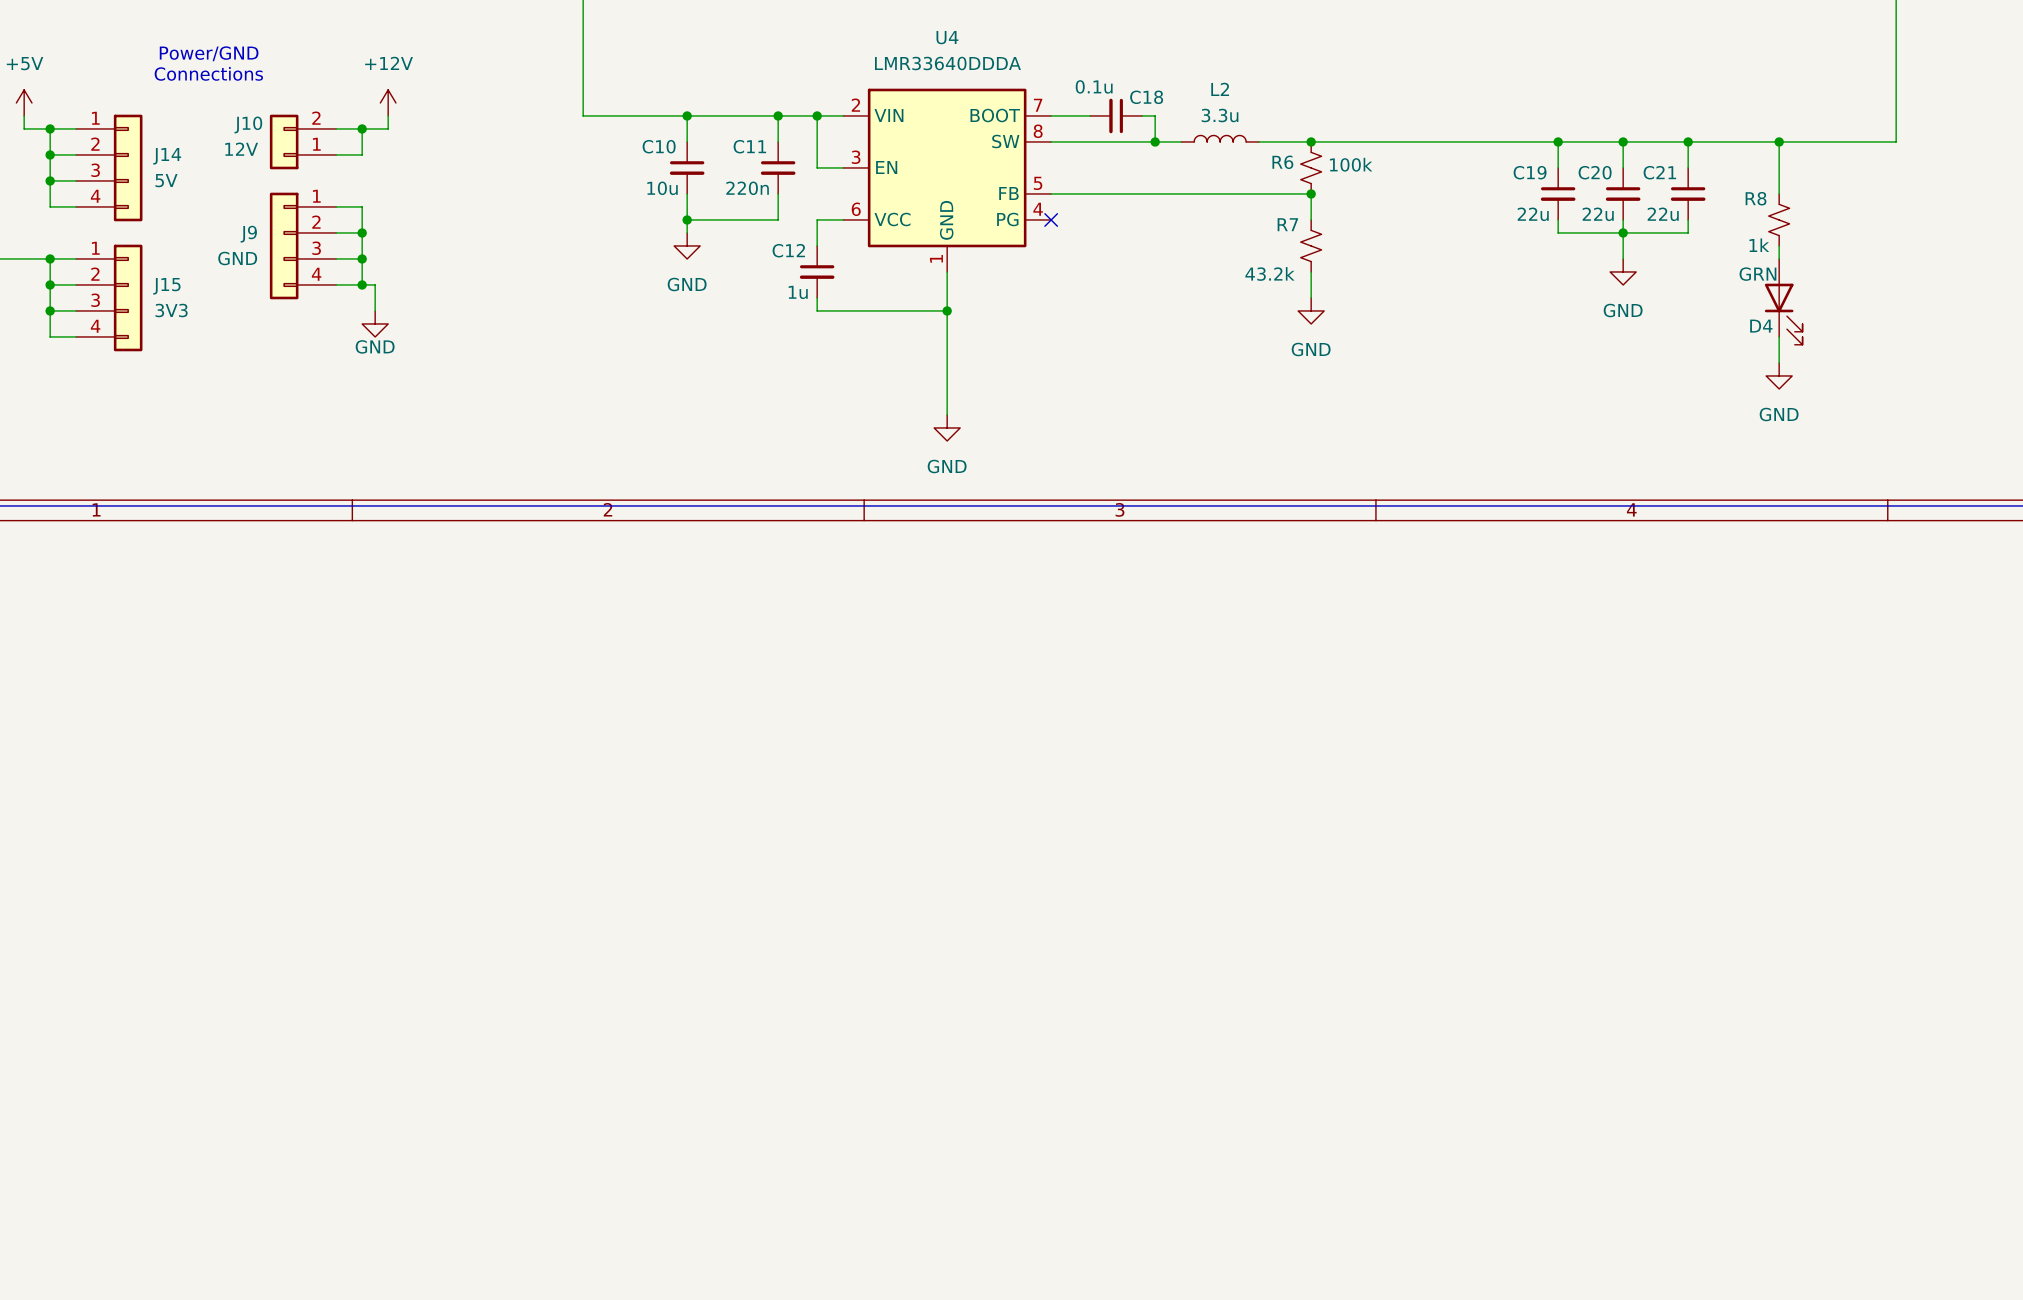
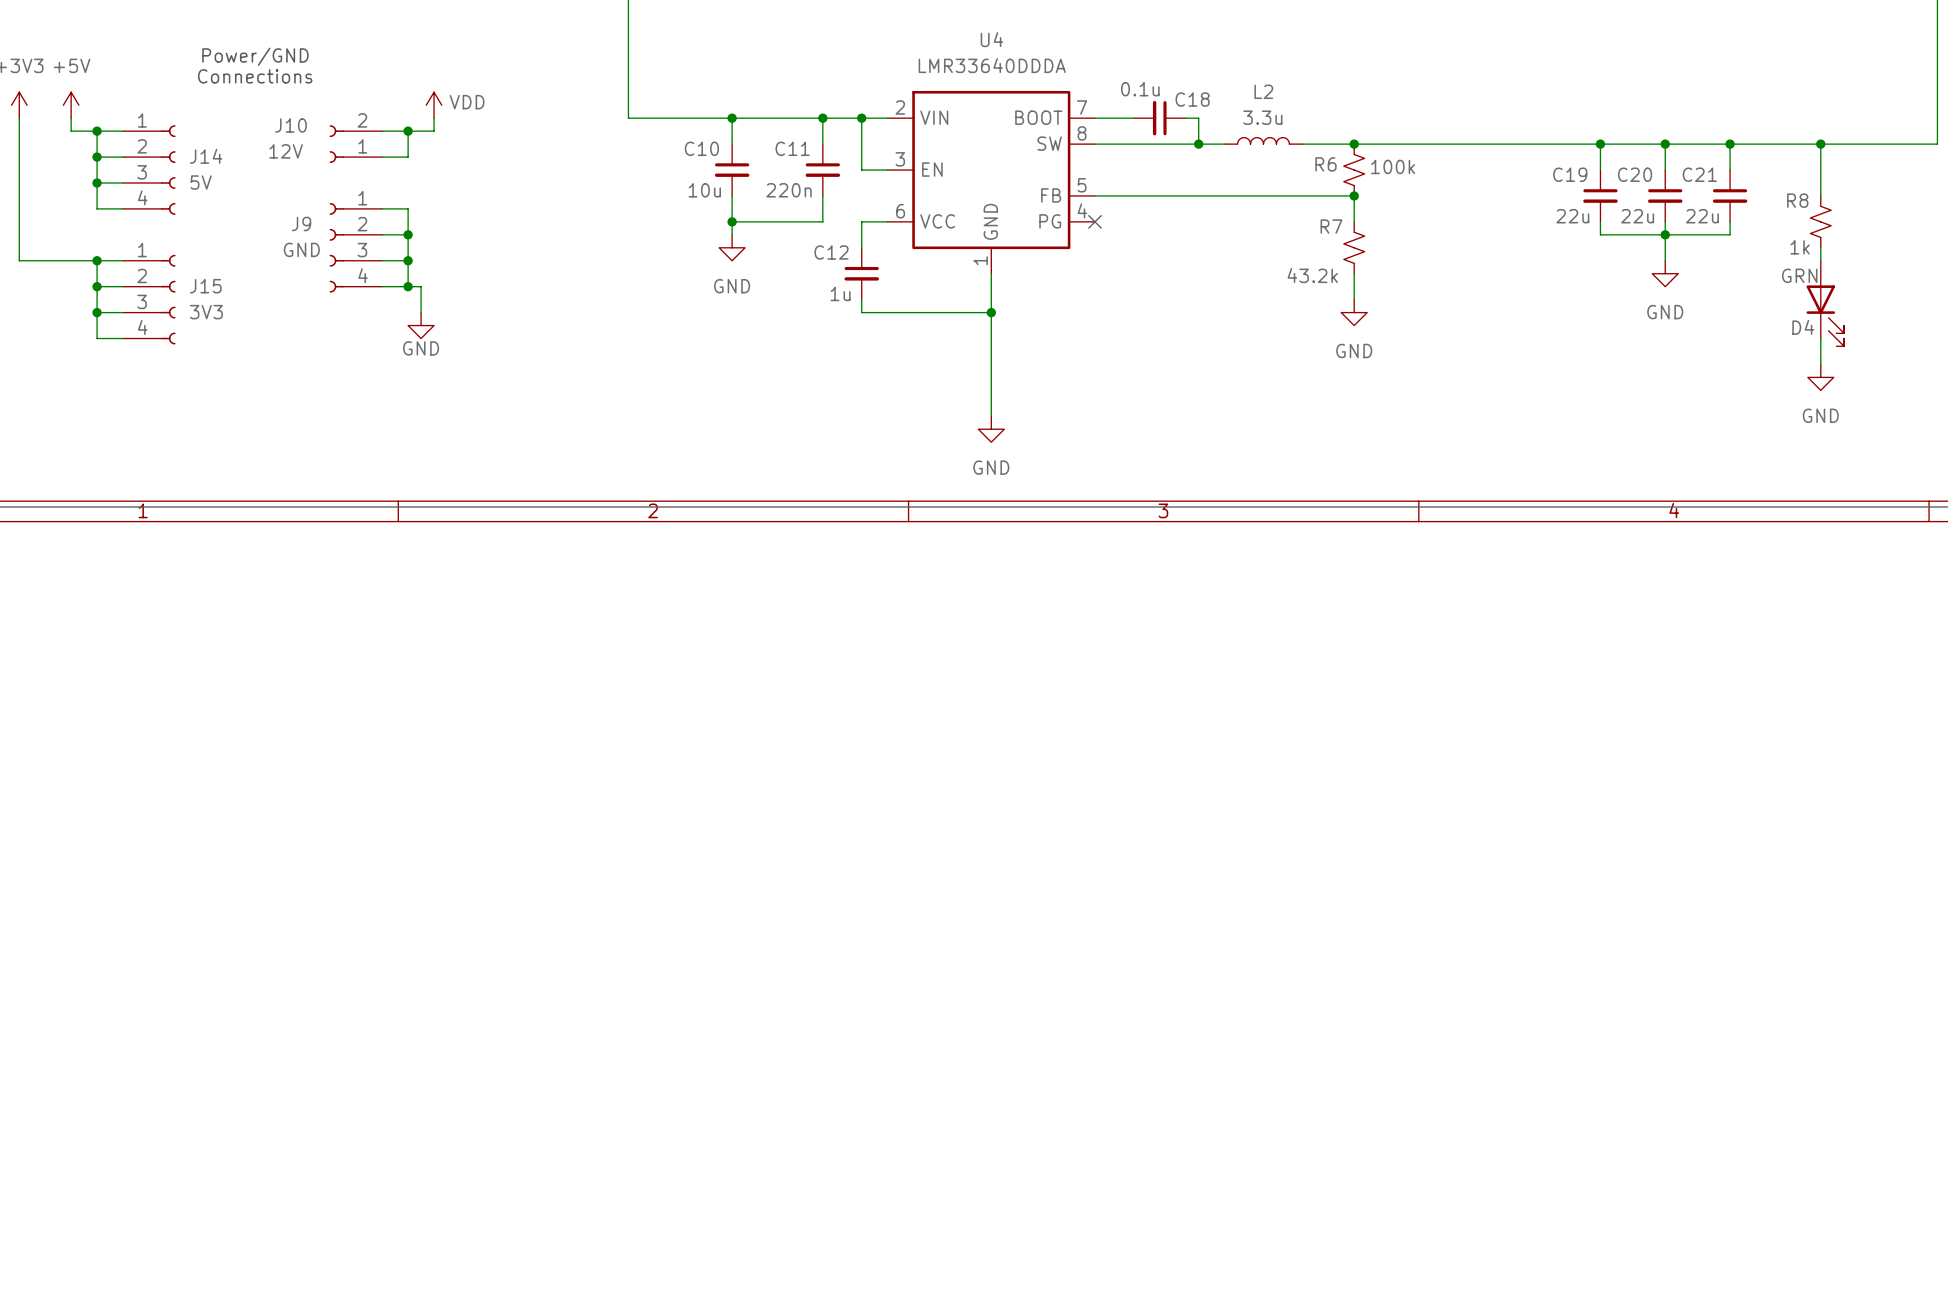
power symbol: +12V (388, 102) -> VDD (434, 105)
J14 symbol: [76, 114, 143, 222] -> [122, 125, 176, 215]
J10 symbol: [269, 114, 337, 170] -> [329, 125, 383, 164]
J9 symbol: [269, 192, 337, 300] -> [329, 202, 383, 293]
J15 symbol: [76, 244, 143, 352] -> [122, 254, 176, 345]

